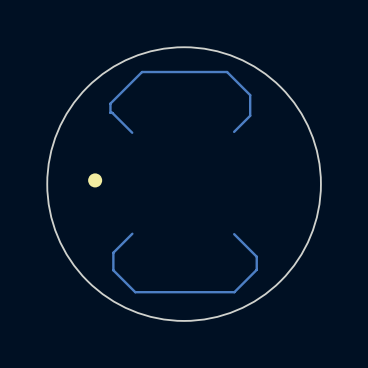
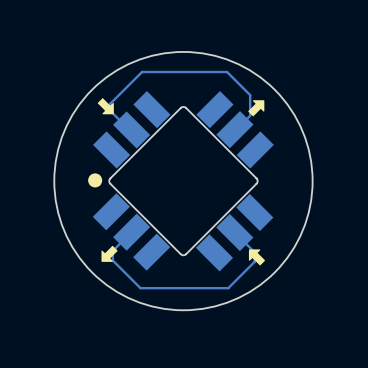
round board edge size: [46, 46, 322, 322] -> [53, 51, 314, 311]
drawing: none -> [97, 98, 114, 115]
drawing: none -> [248, 100, 265, 117]
board edge: none -> (186, 108) (257, 181) (183, 255) (109, 181) (180, 108) (186, 108)
part: none -> (131, 129)
part: none -> (235, 129)
part: none -> (131, 231)
track: none -> (131, 232) (112, 250) (112, 260) (140, 288) (228, 288) (254, 261) (254, 252) (234, 232)
part: none -> (234, 232)
track: (132, 233) (113, 252) (113, 270) (135, 292) (234, 292) (256, 269) (256, 256) (234, 234) -> none
drawing: none -> [101, 245, 118, 262]
drawing: none -> [248, 249, 265, 266]

